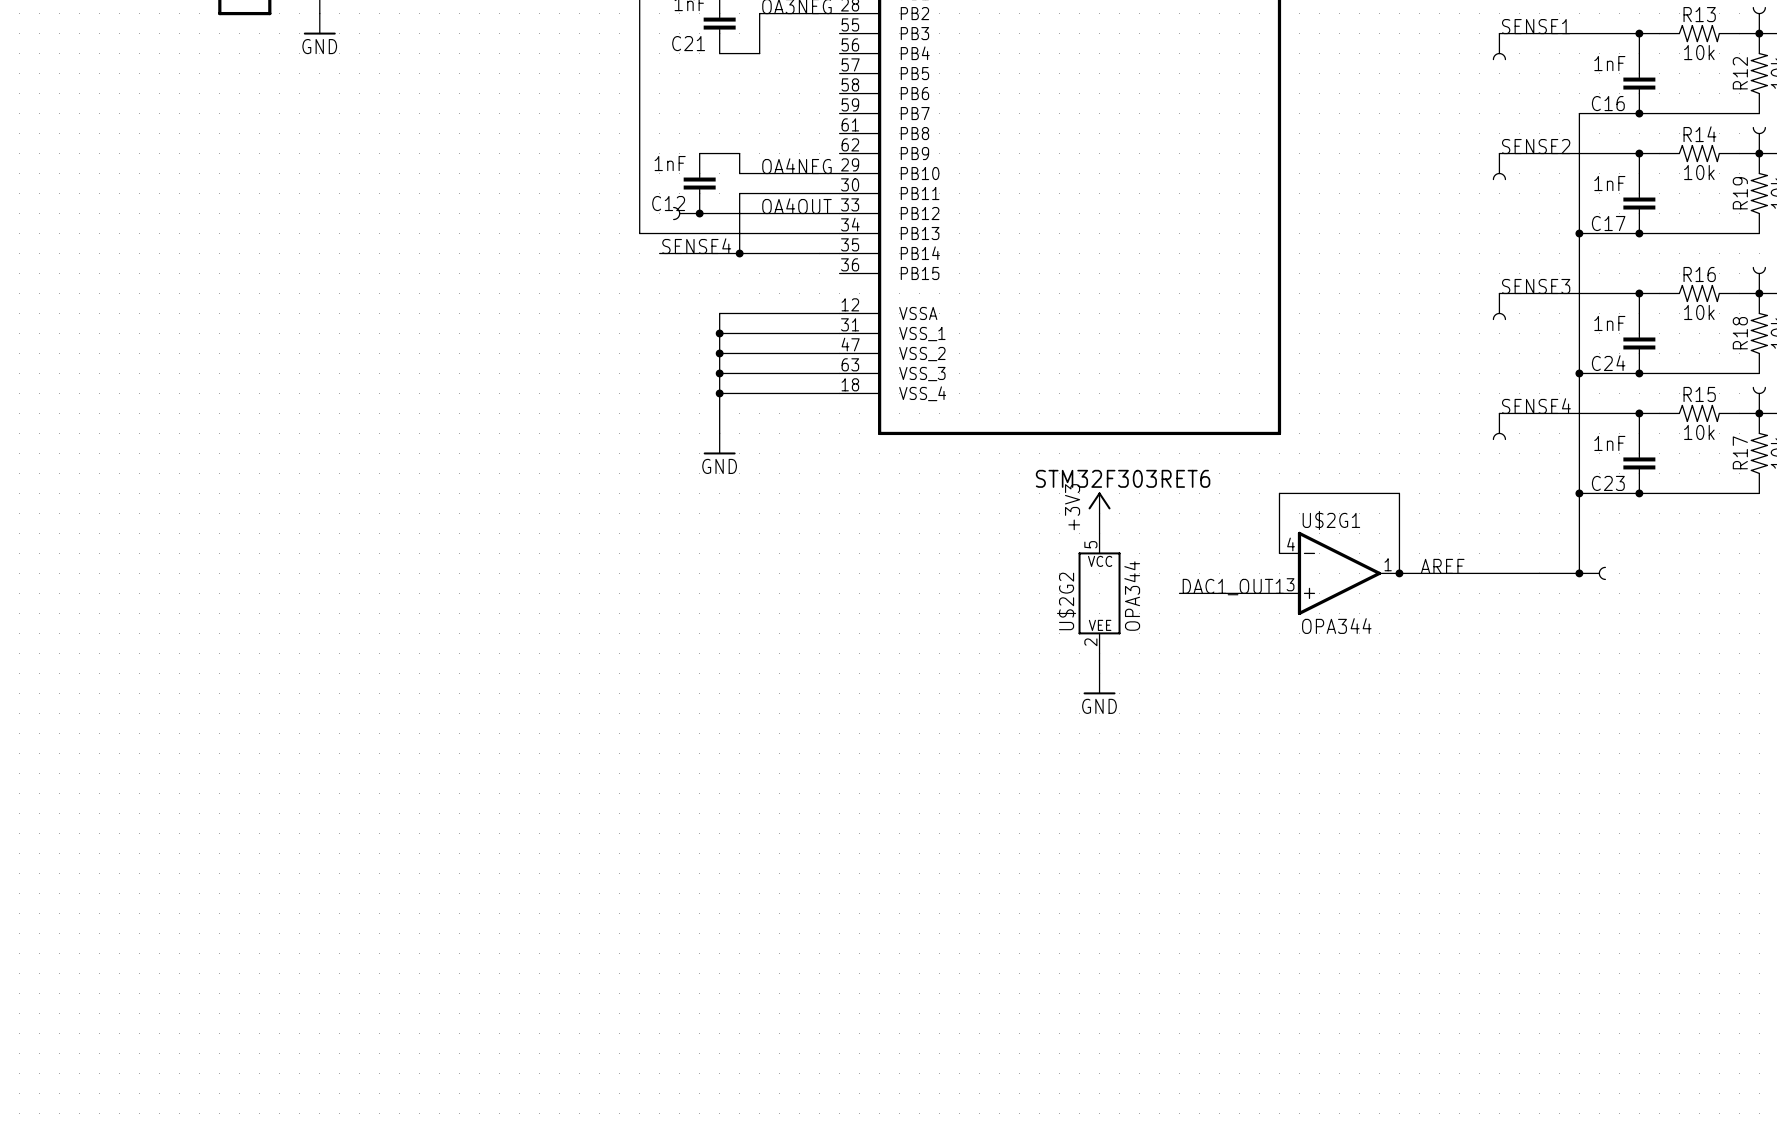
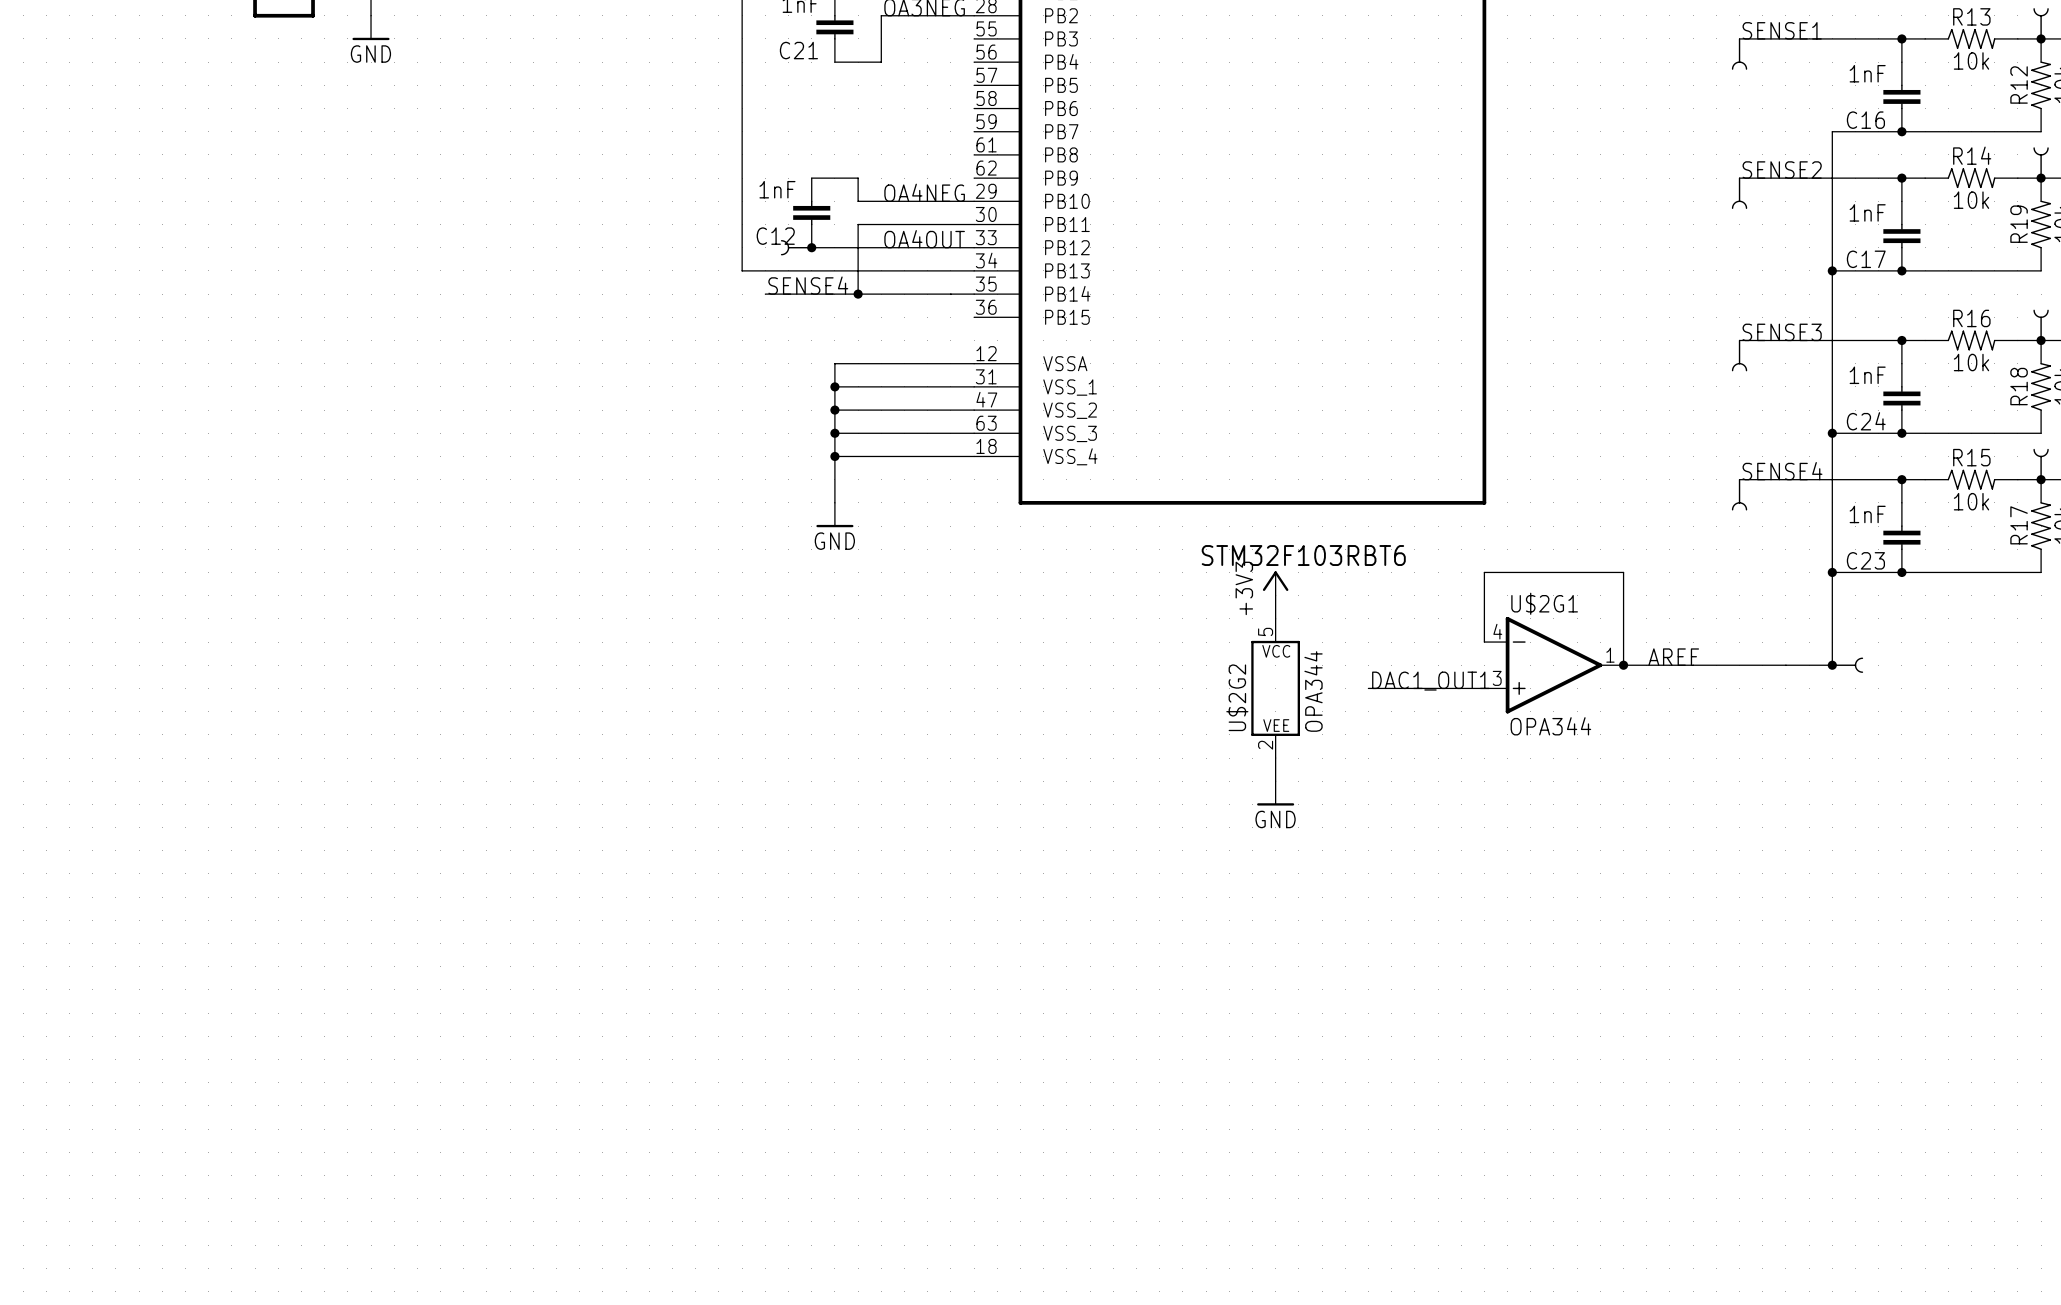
part value: STM32F303RET6 (1123, 478) -> STM32F103RBT6 (1303, 555)

